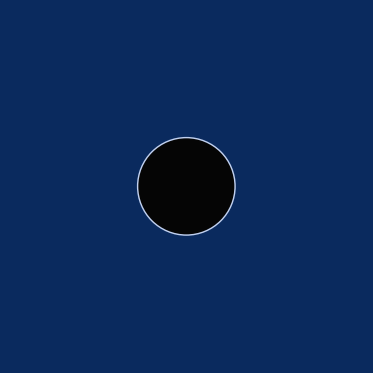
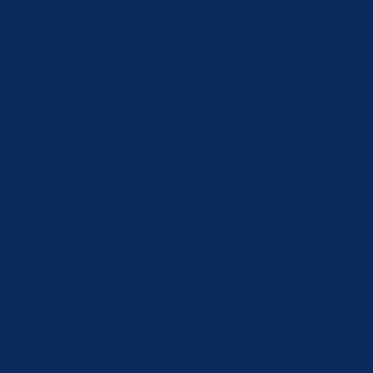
part: (186, 186) -> none

